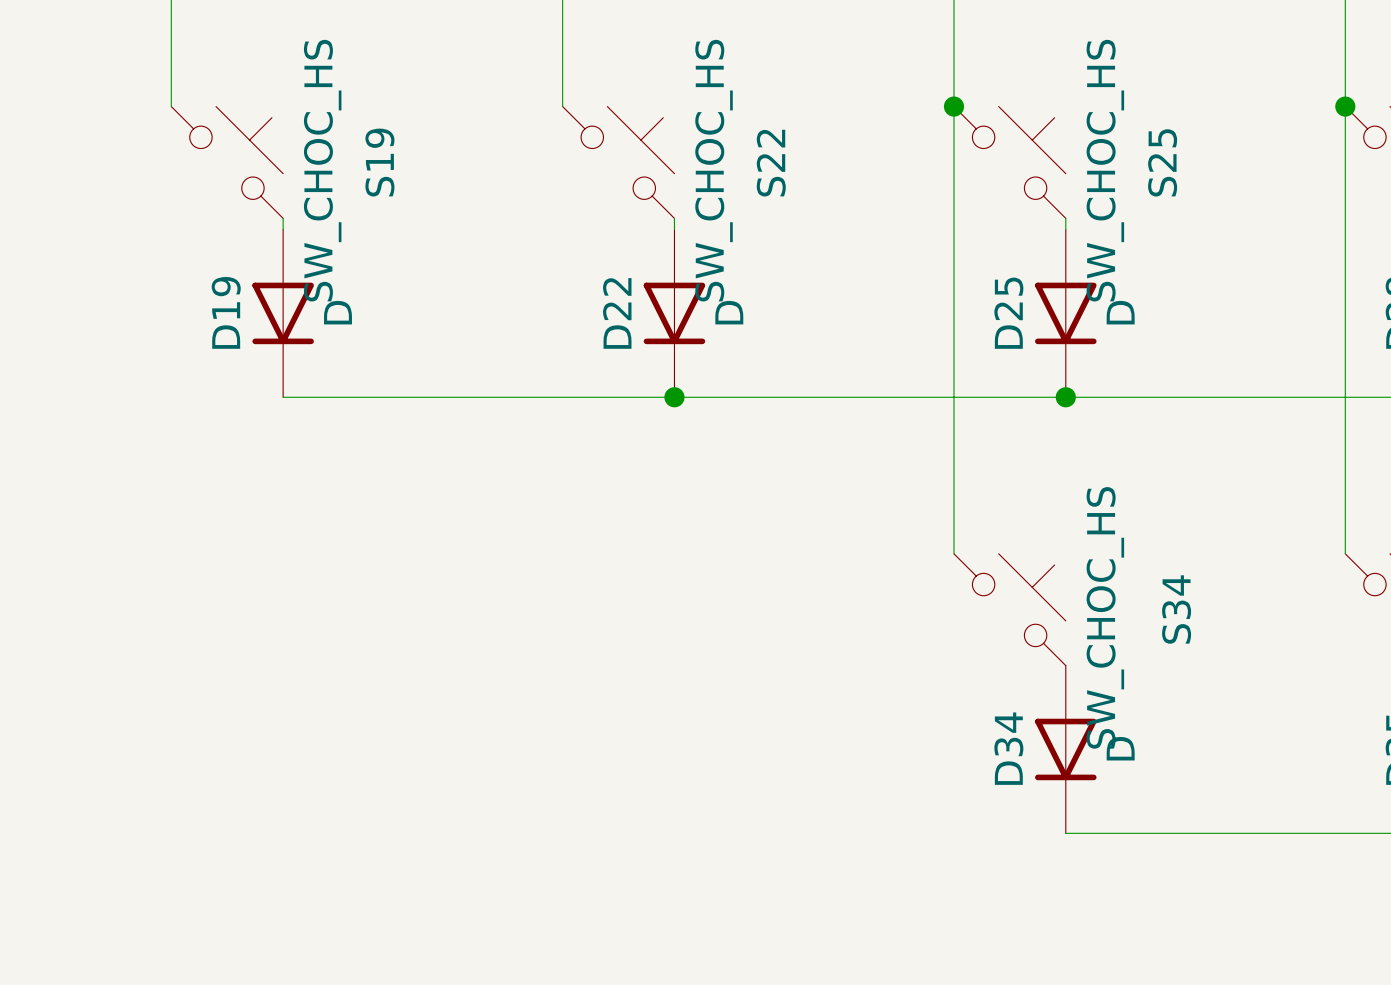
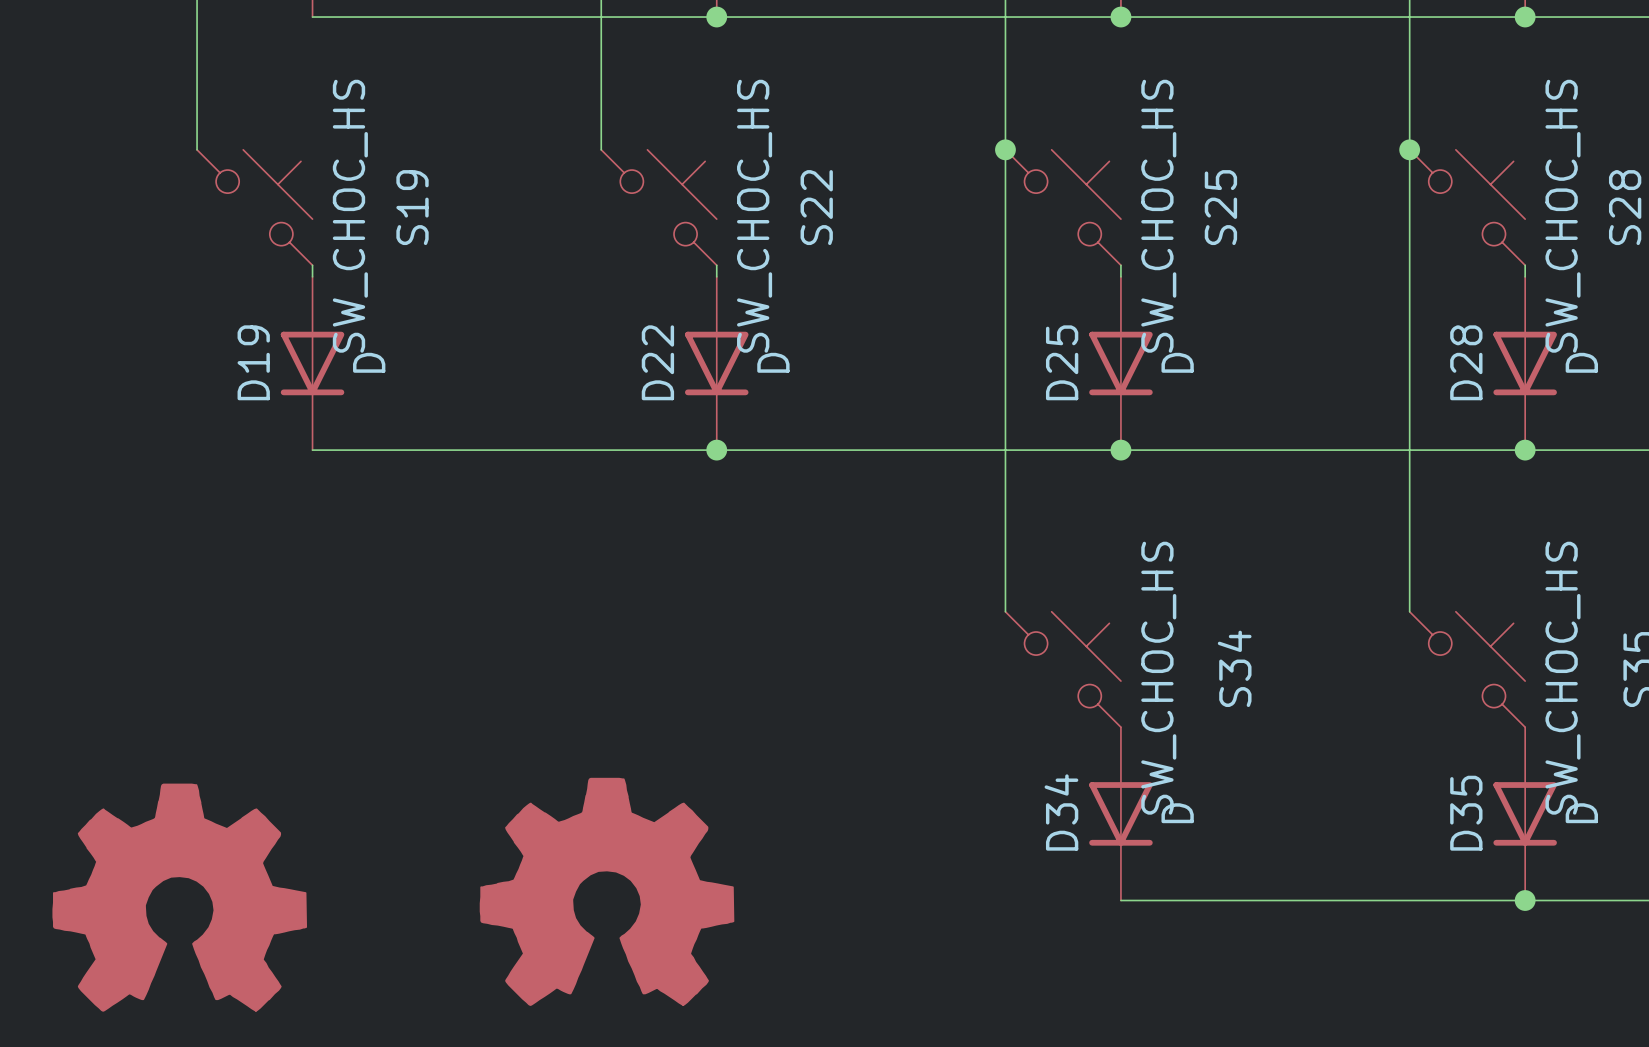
part: none -> (607, 891)
part: none -> (179, 897)

